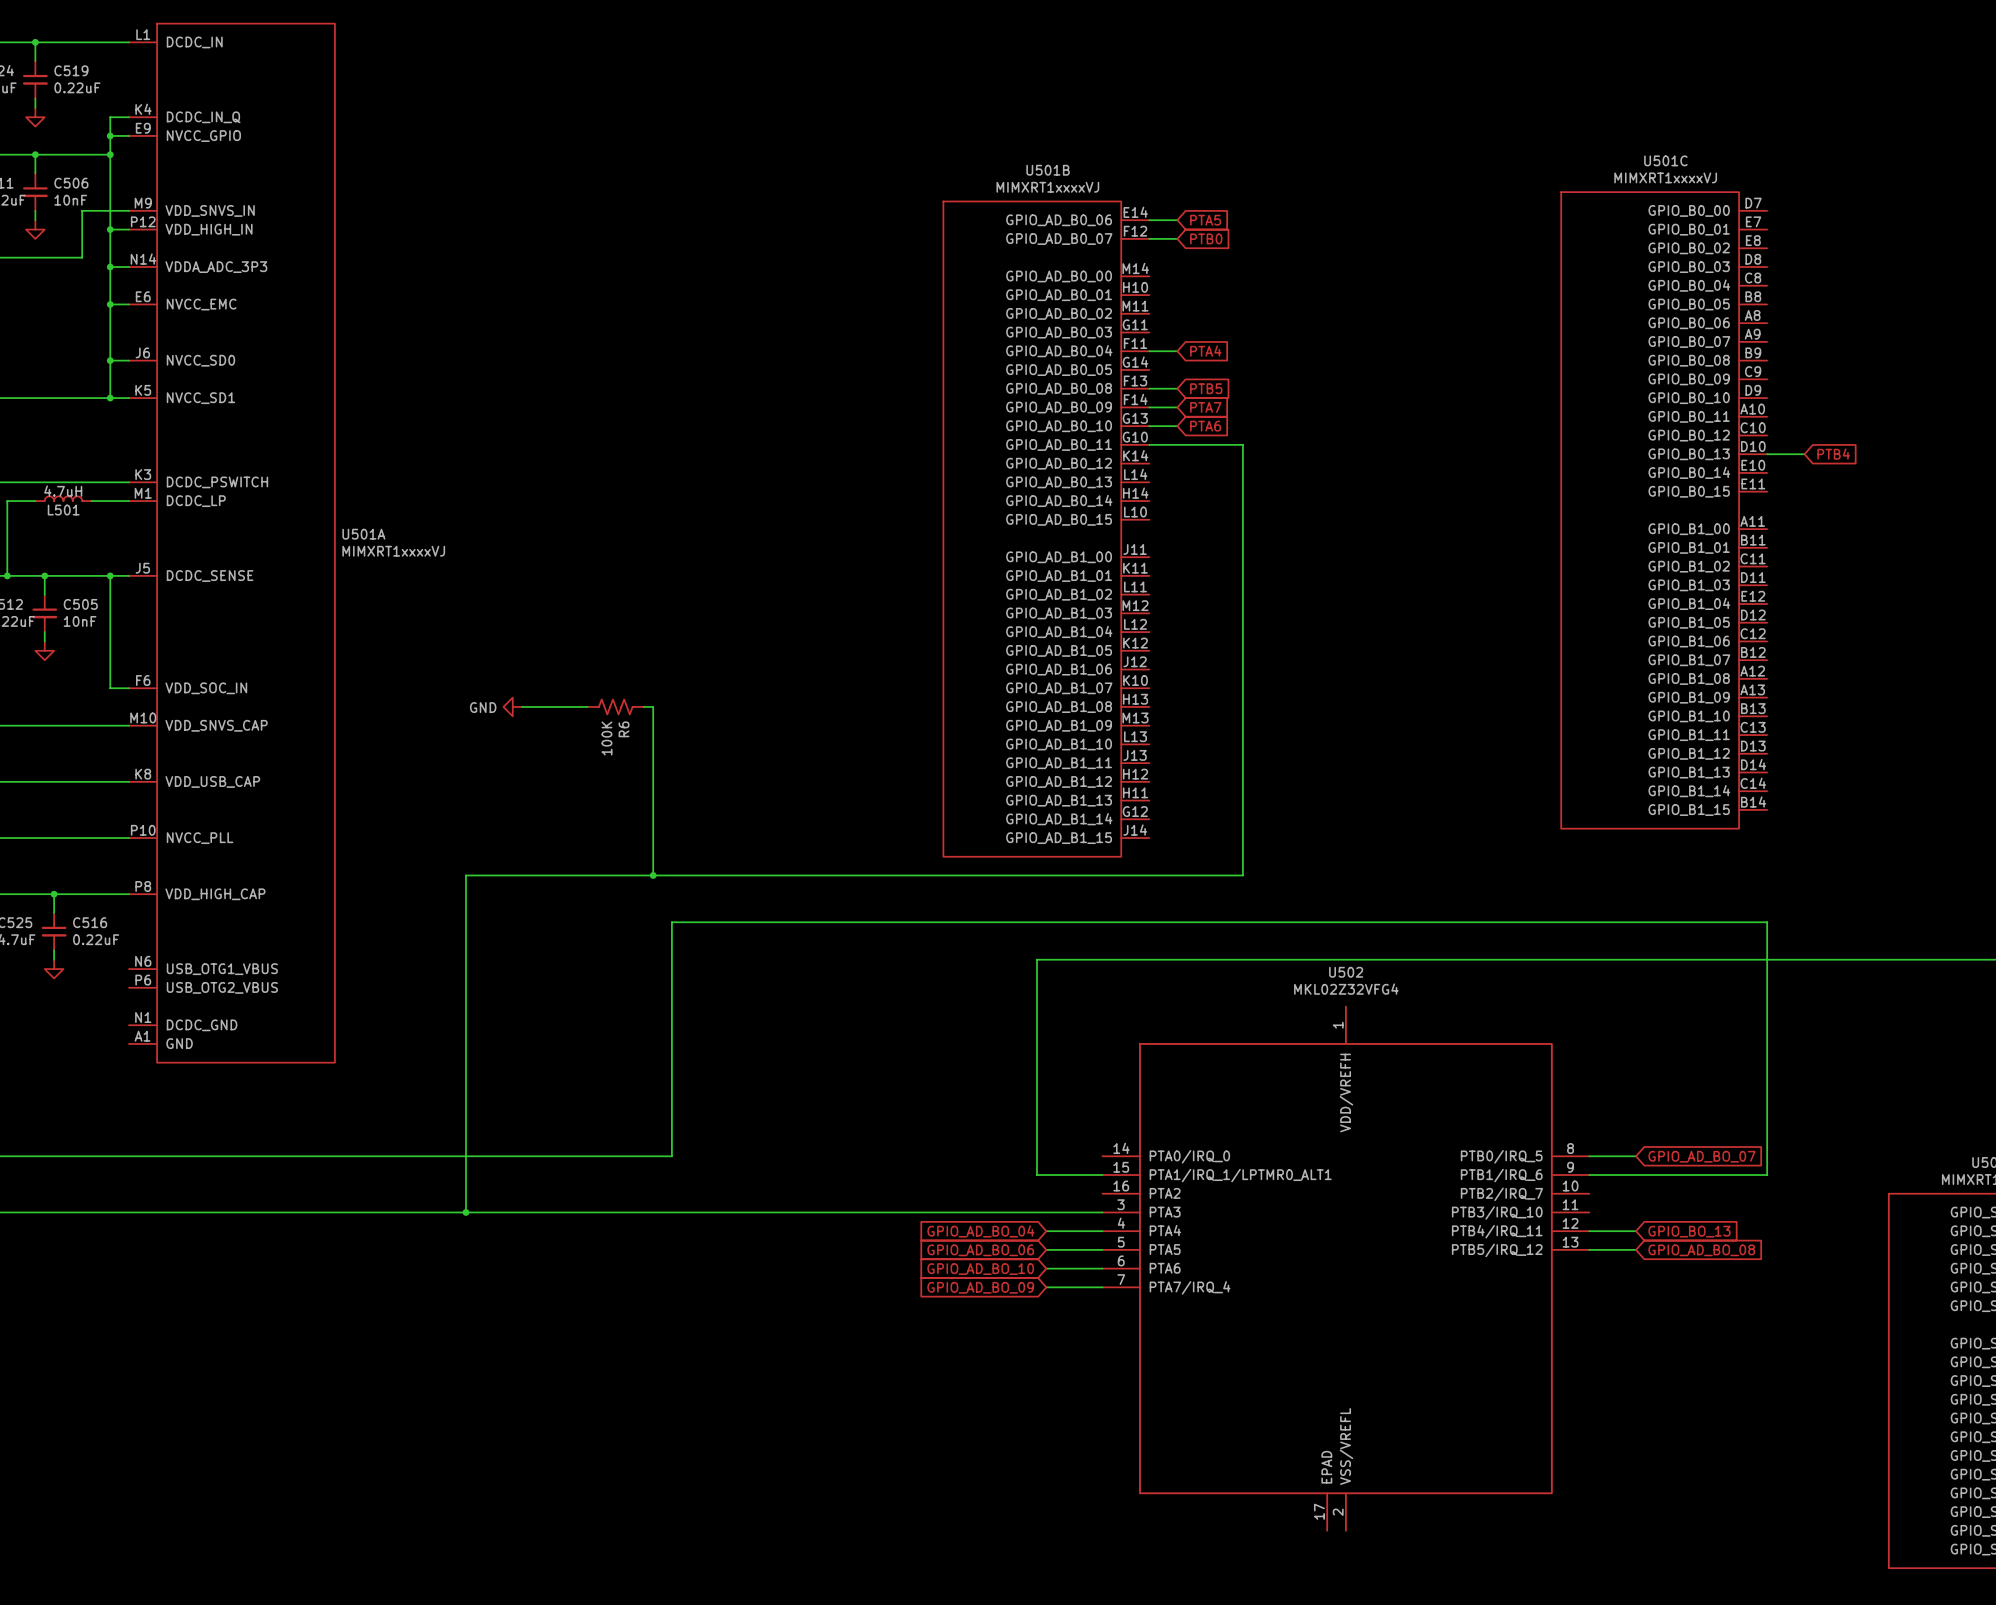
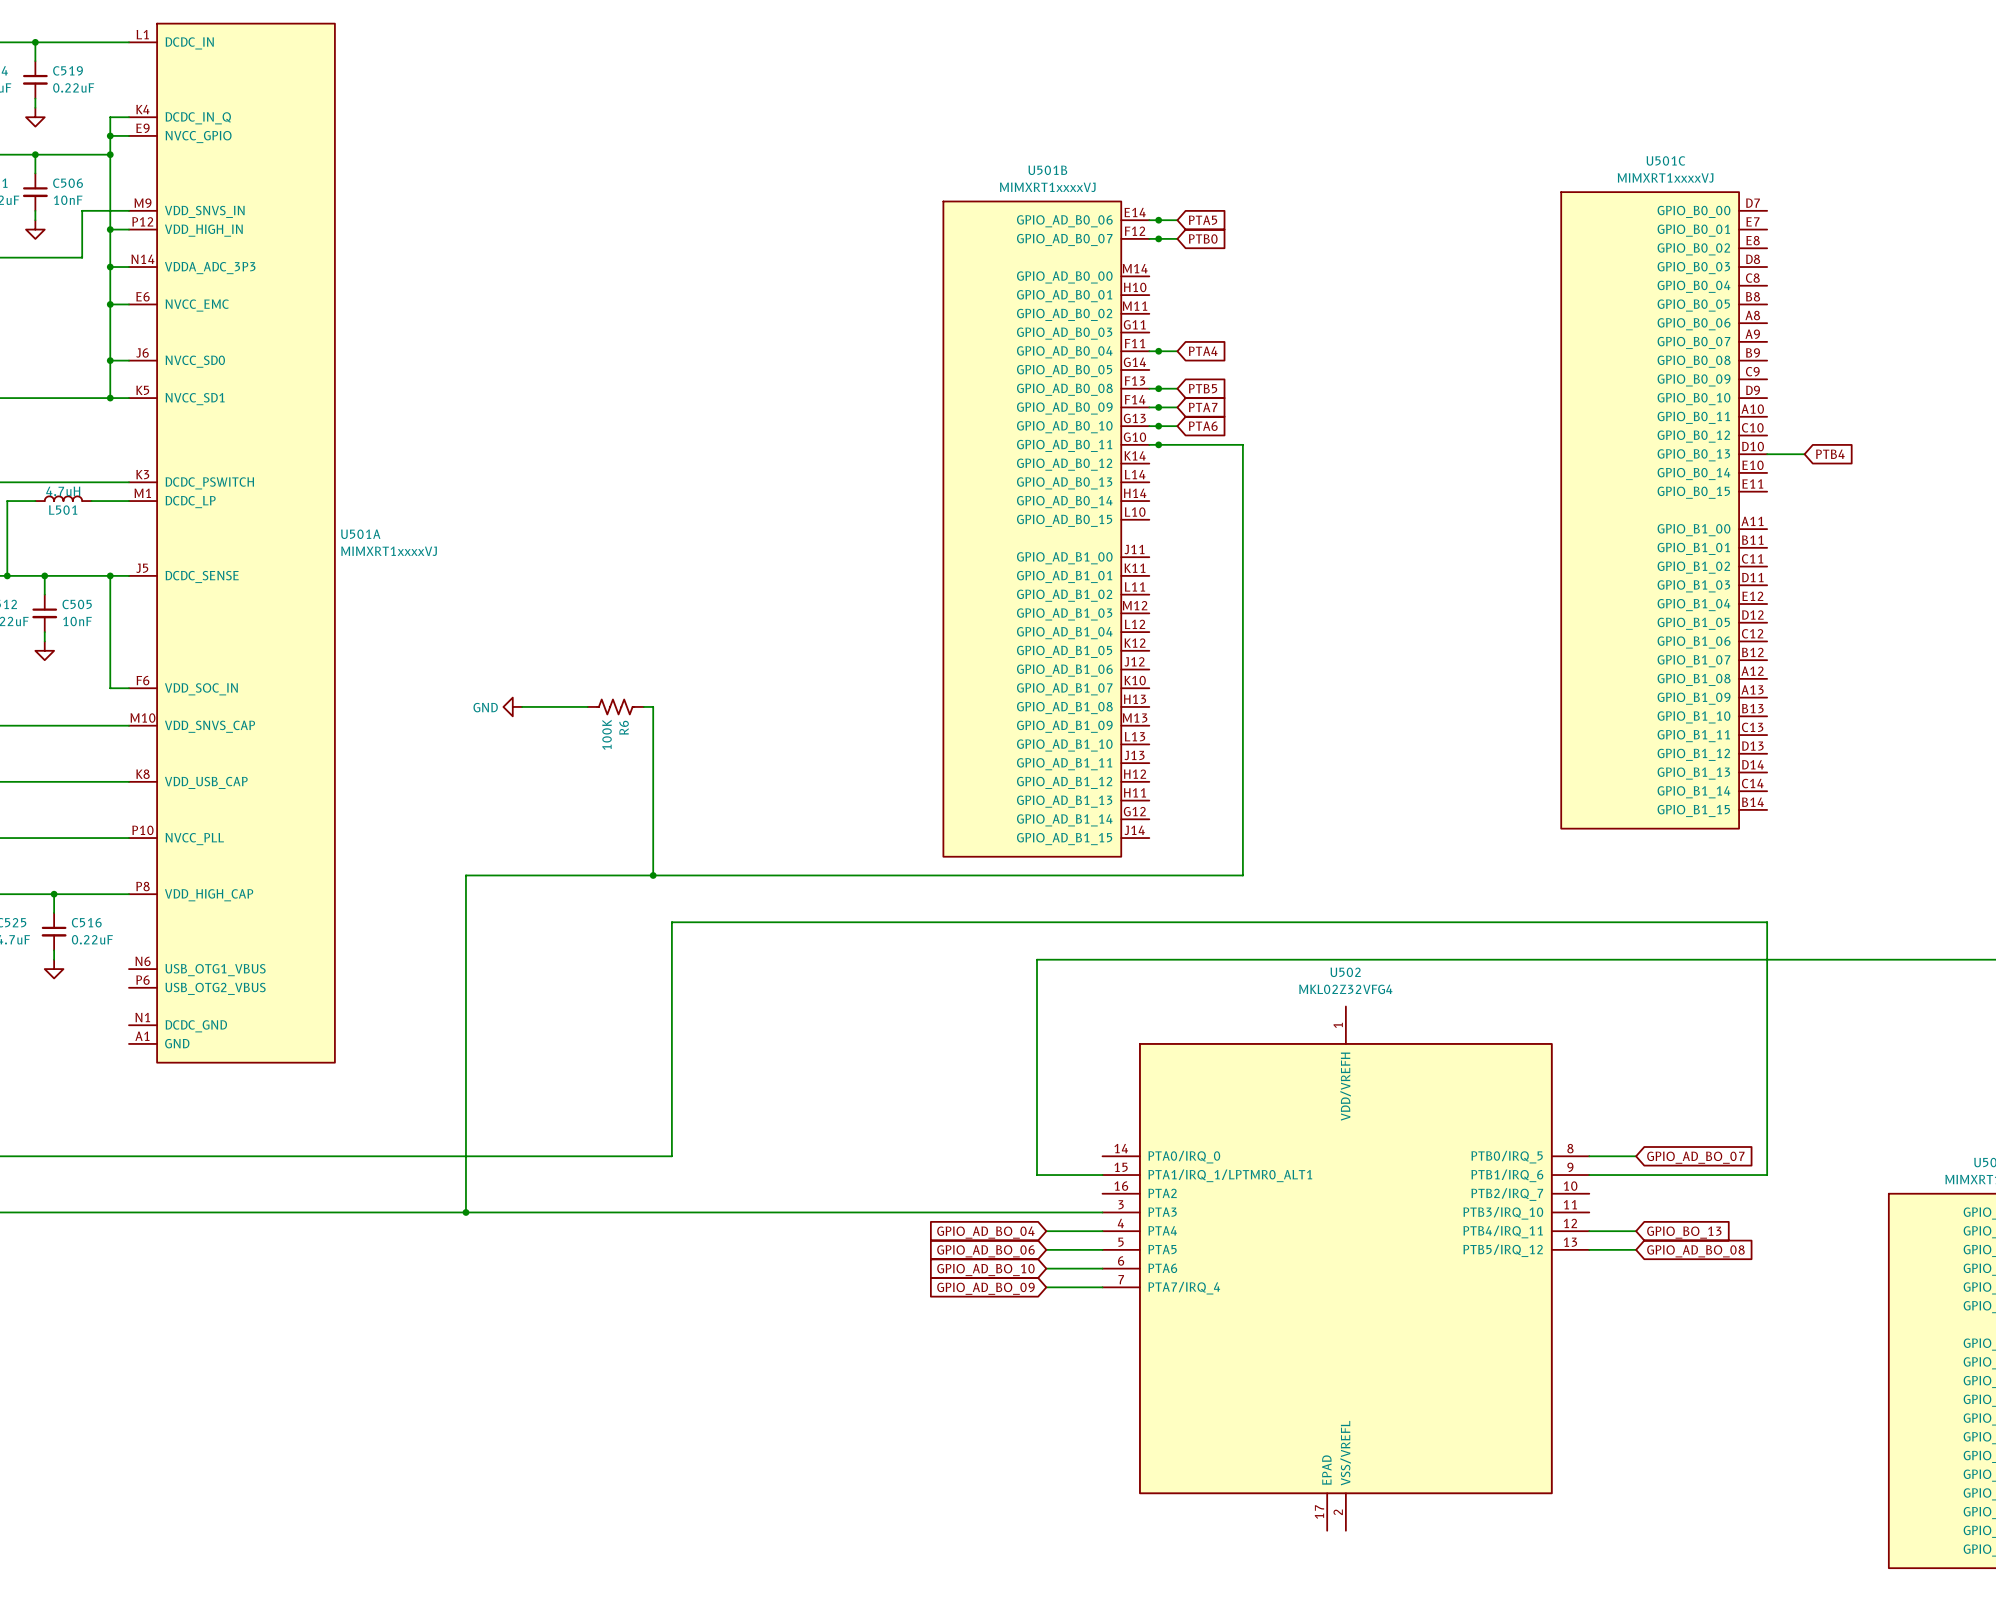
junction: none -> (1158, 220)
junction: none -> (1158, 238)
junction: none -> (1158, 351)
junction: none -> (1158, 388)
junction: none -> (1158, 407)
junction: none -> (1158, 426)
junction: none -> (1158, 444)

